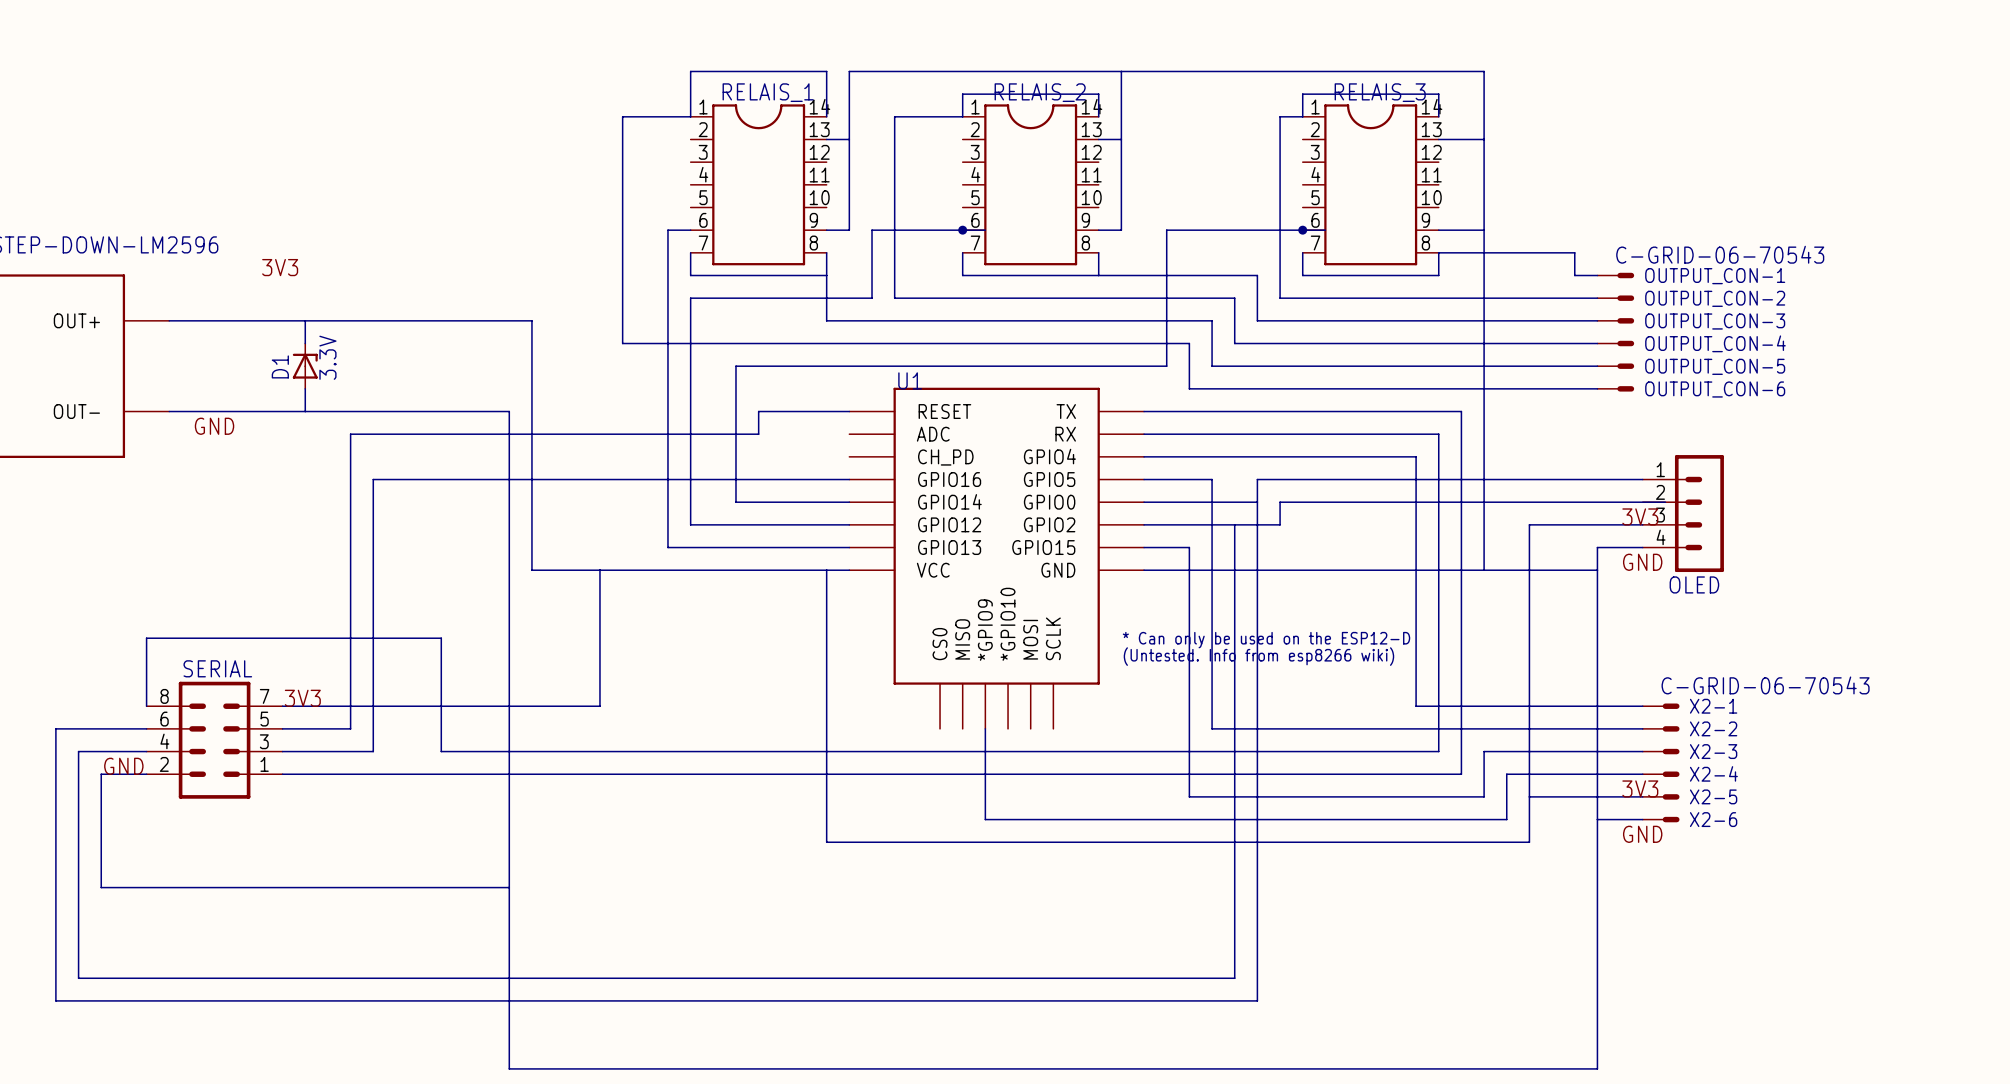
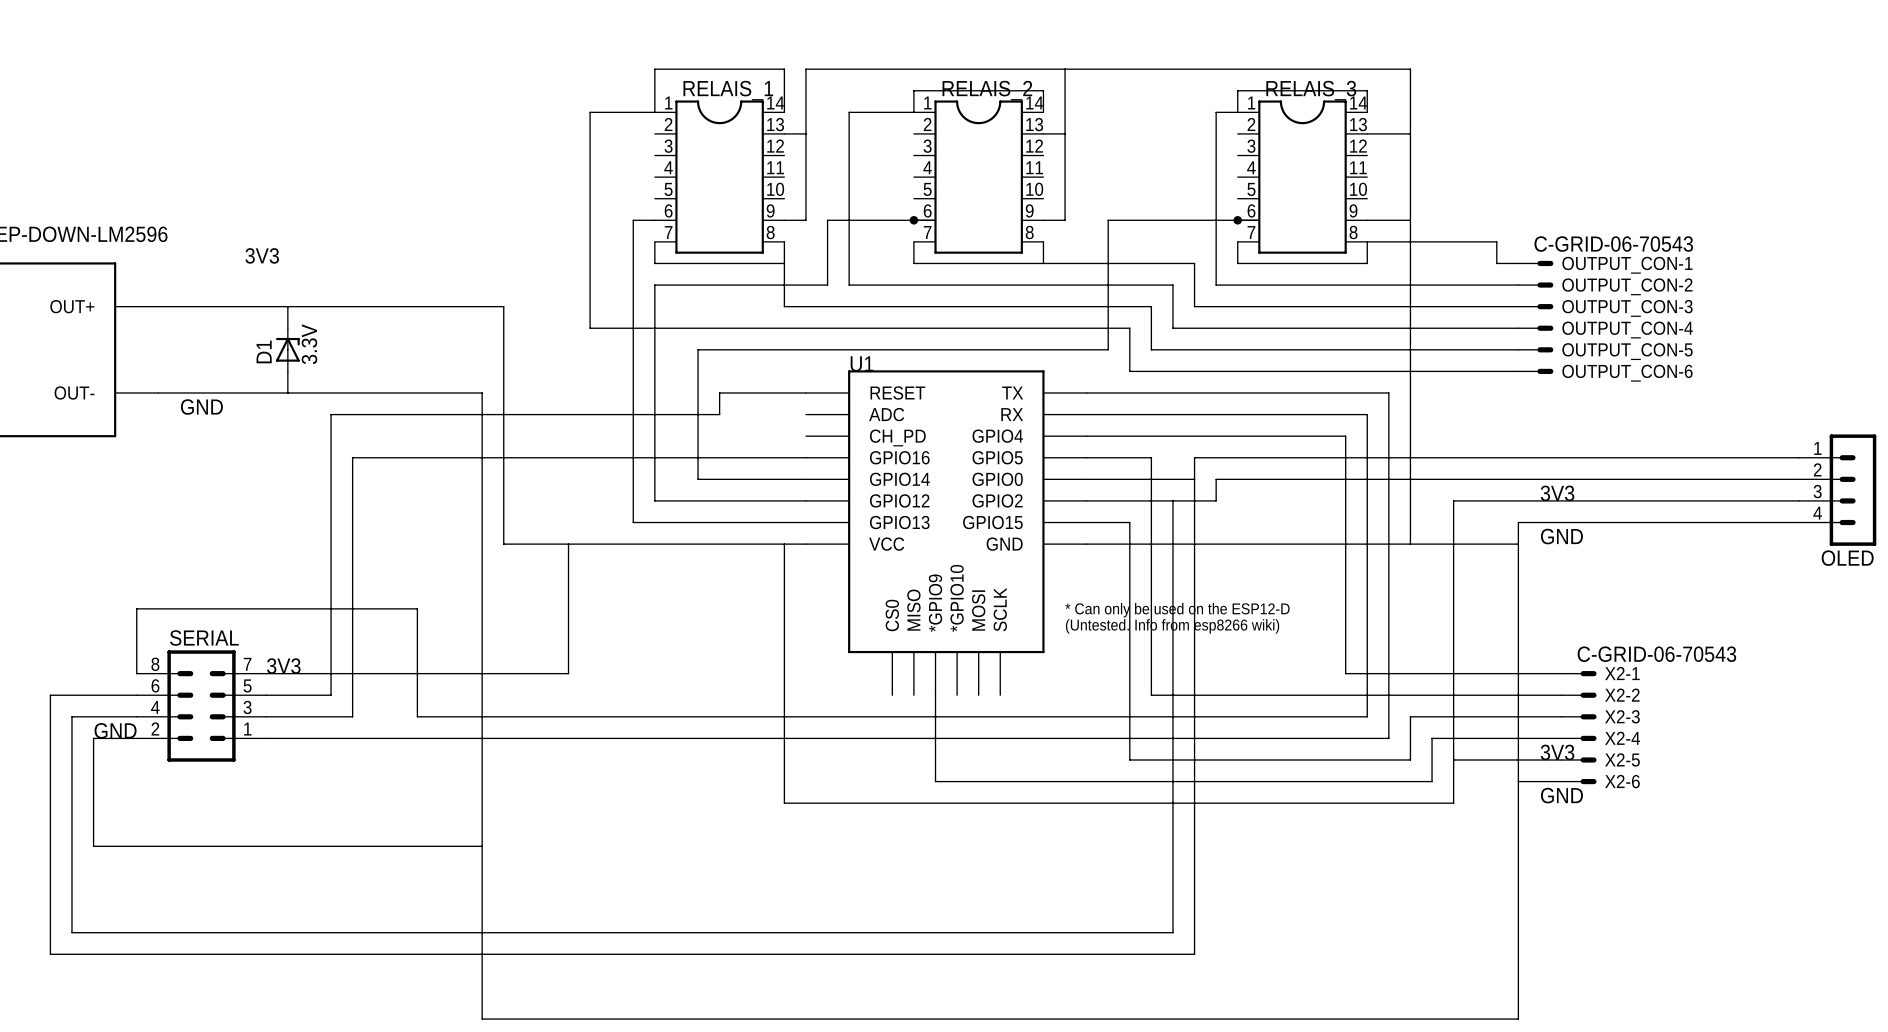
wire: none -> (1561, 457) (1799, 457)
wire: none -> (1583, 479) (1799, 479)
OLED: (1683, 513) -> none
OLED: none -> (1837, 490)
wire: none -> (1561, 500) (1799, 500)
wire: none -> (1561, 522) (1799, 522)

